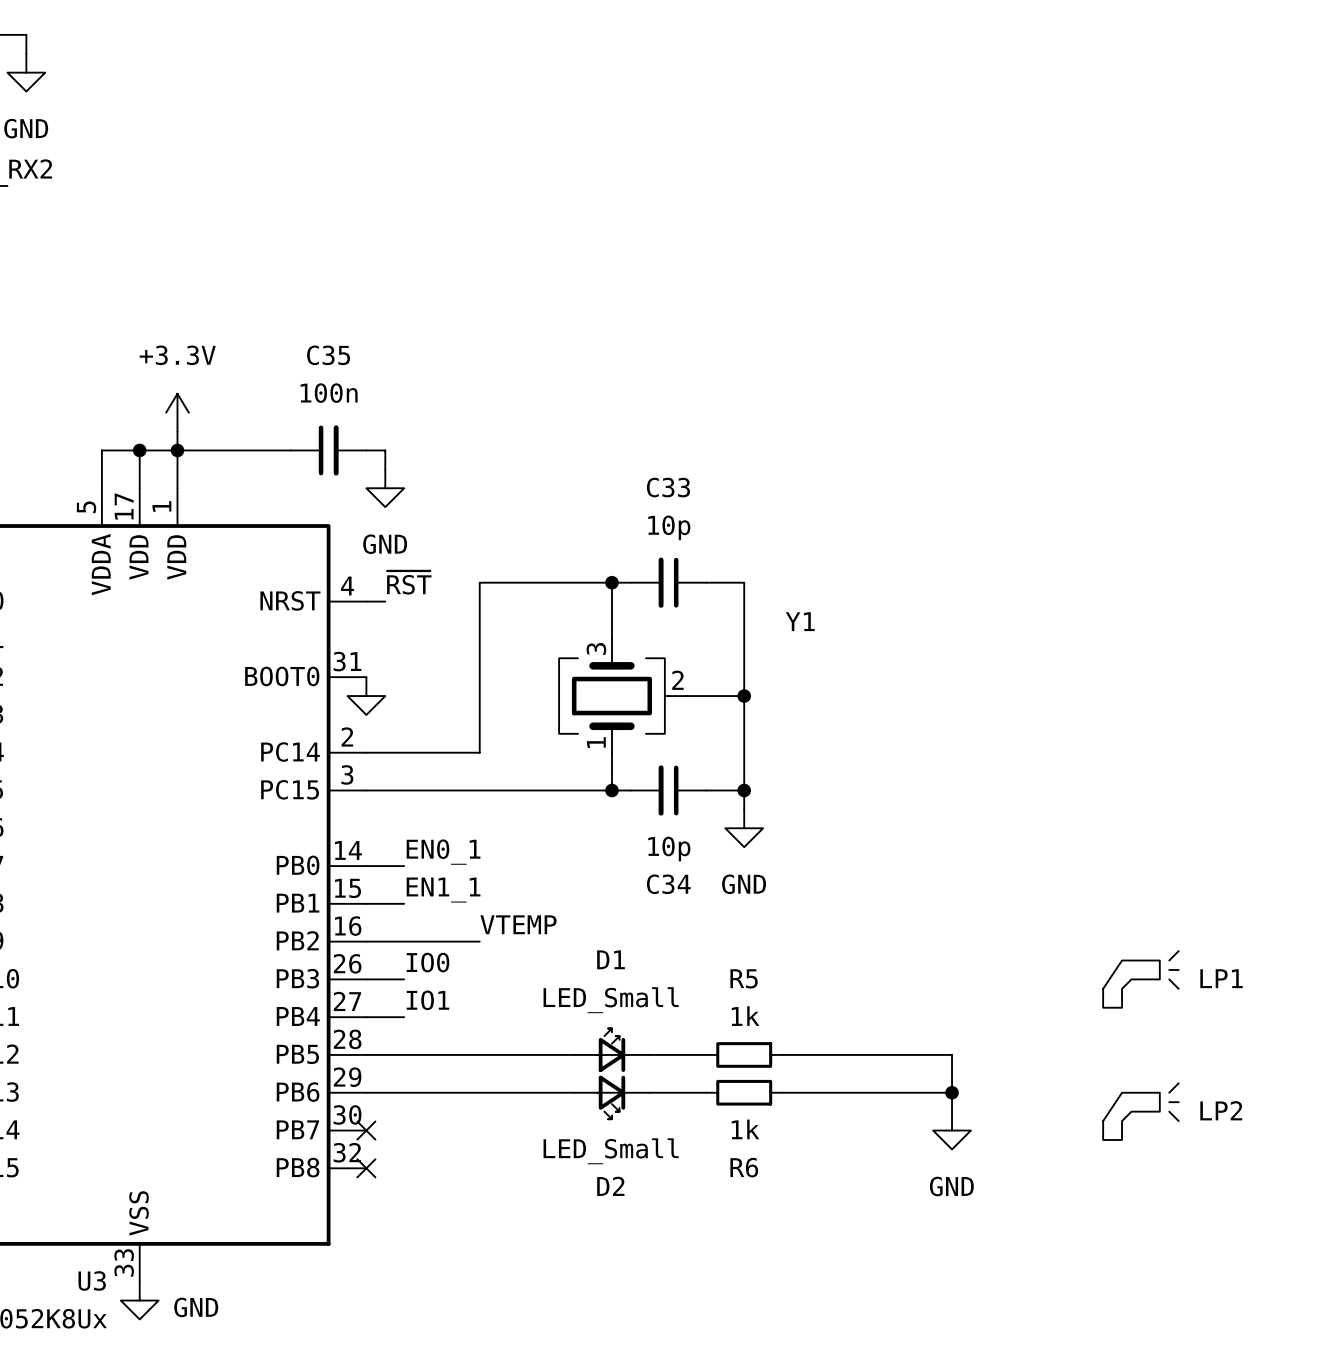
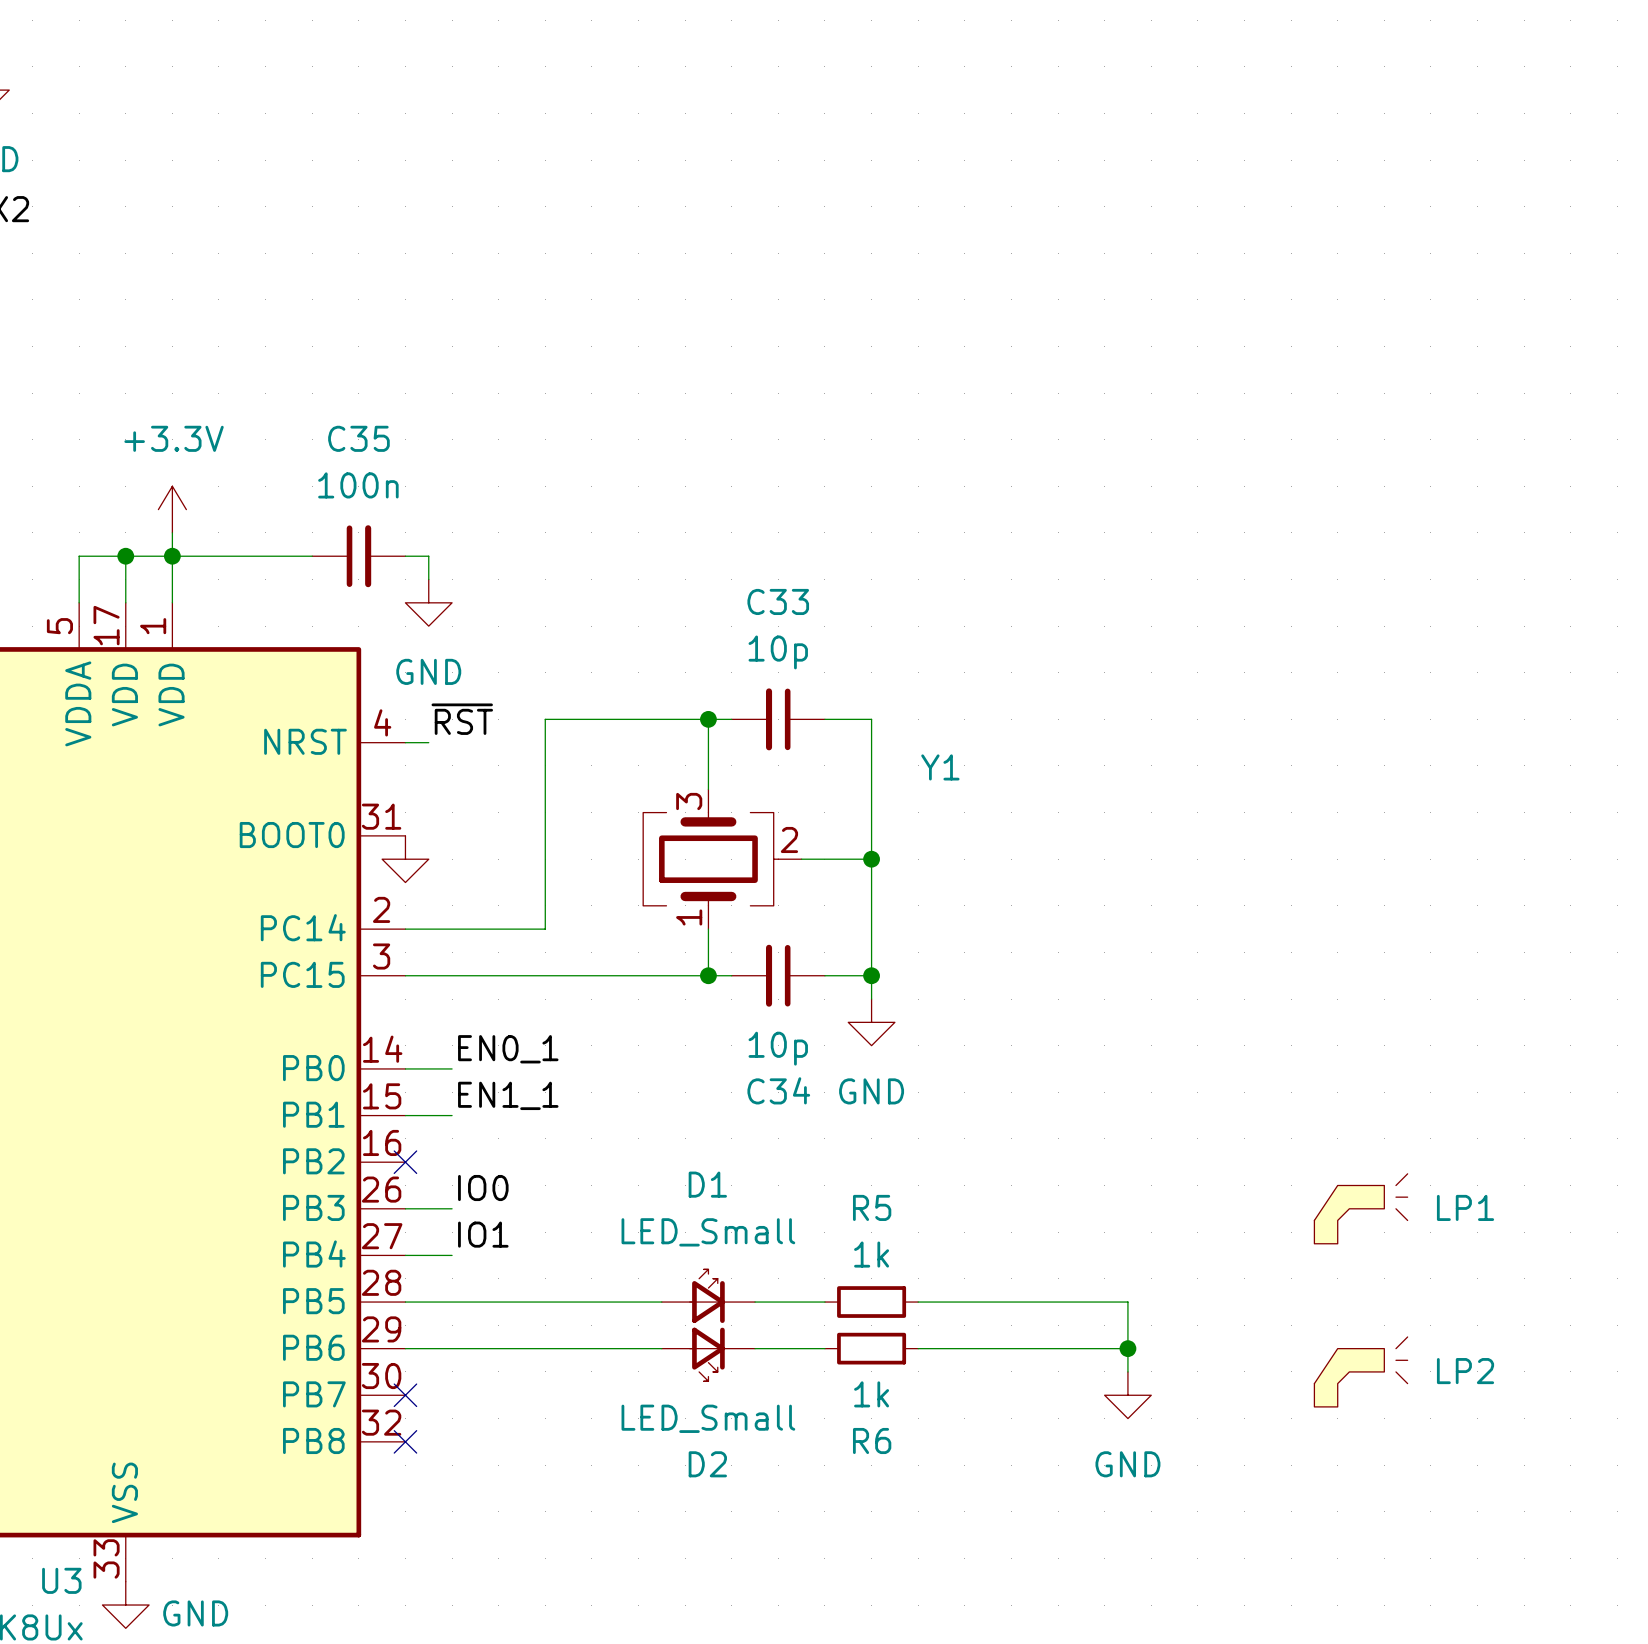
label: VTEMP (518, 924) -> none
wire: (366, 941) (479, 941) -> none
no-connect mark: none -> (405, 1162)

